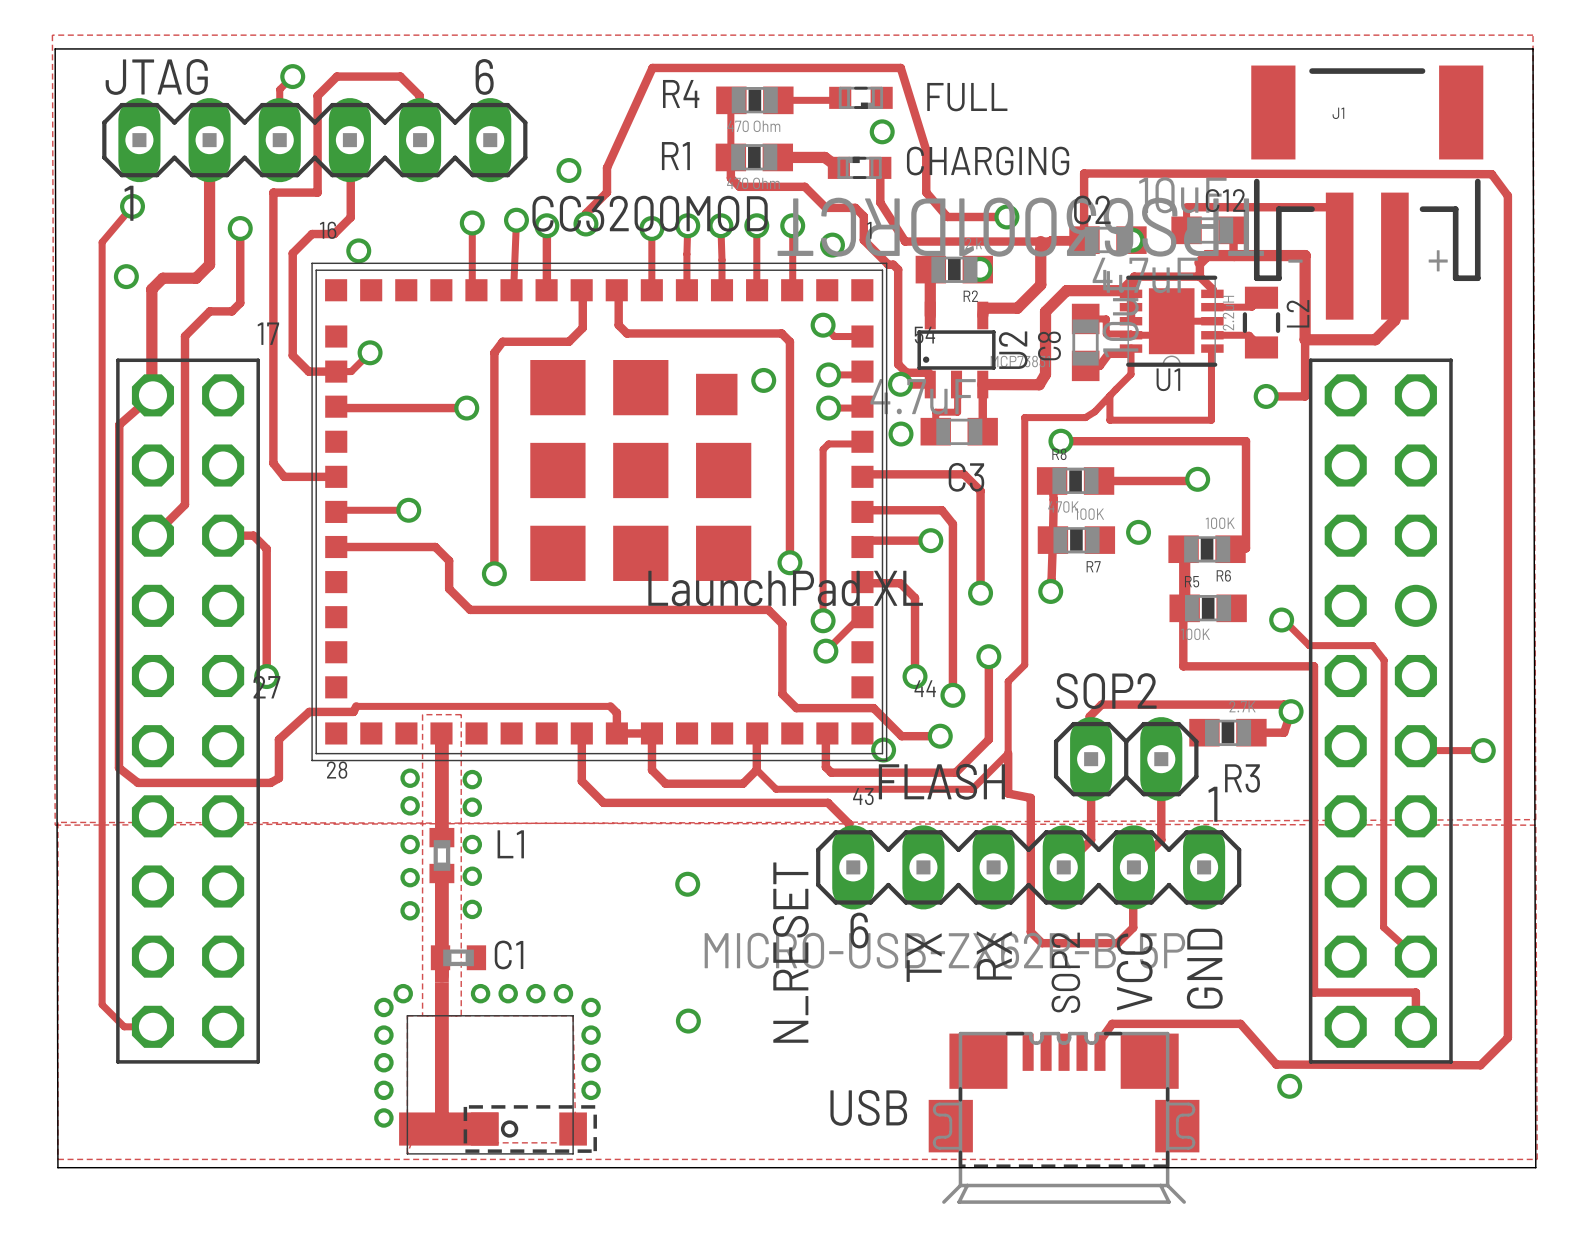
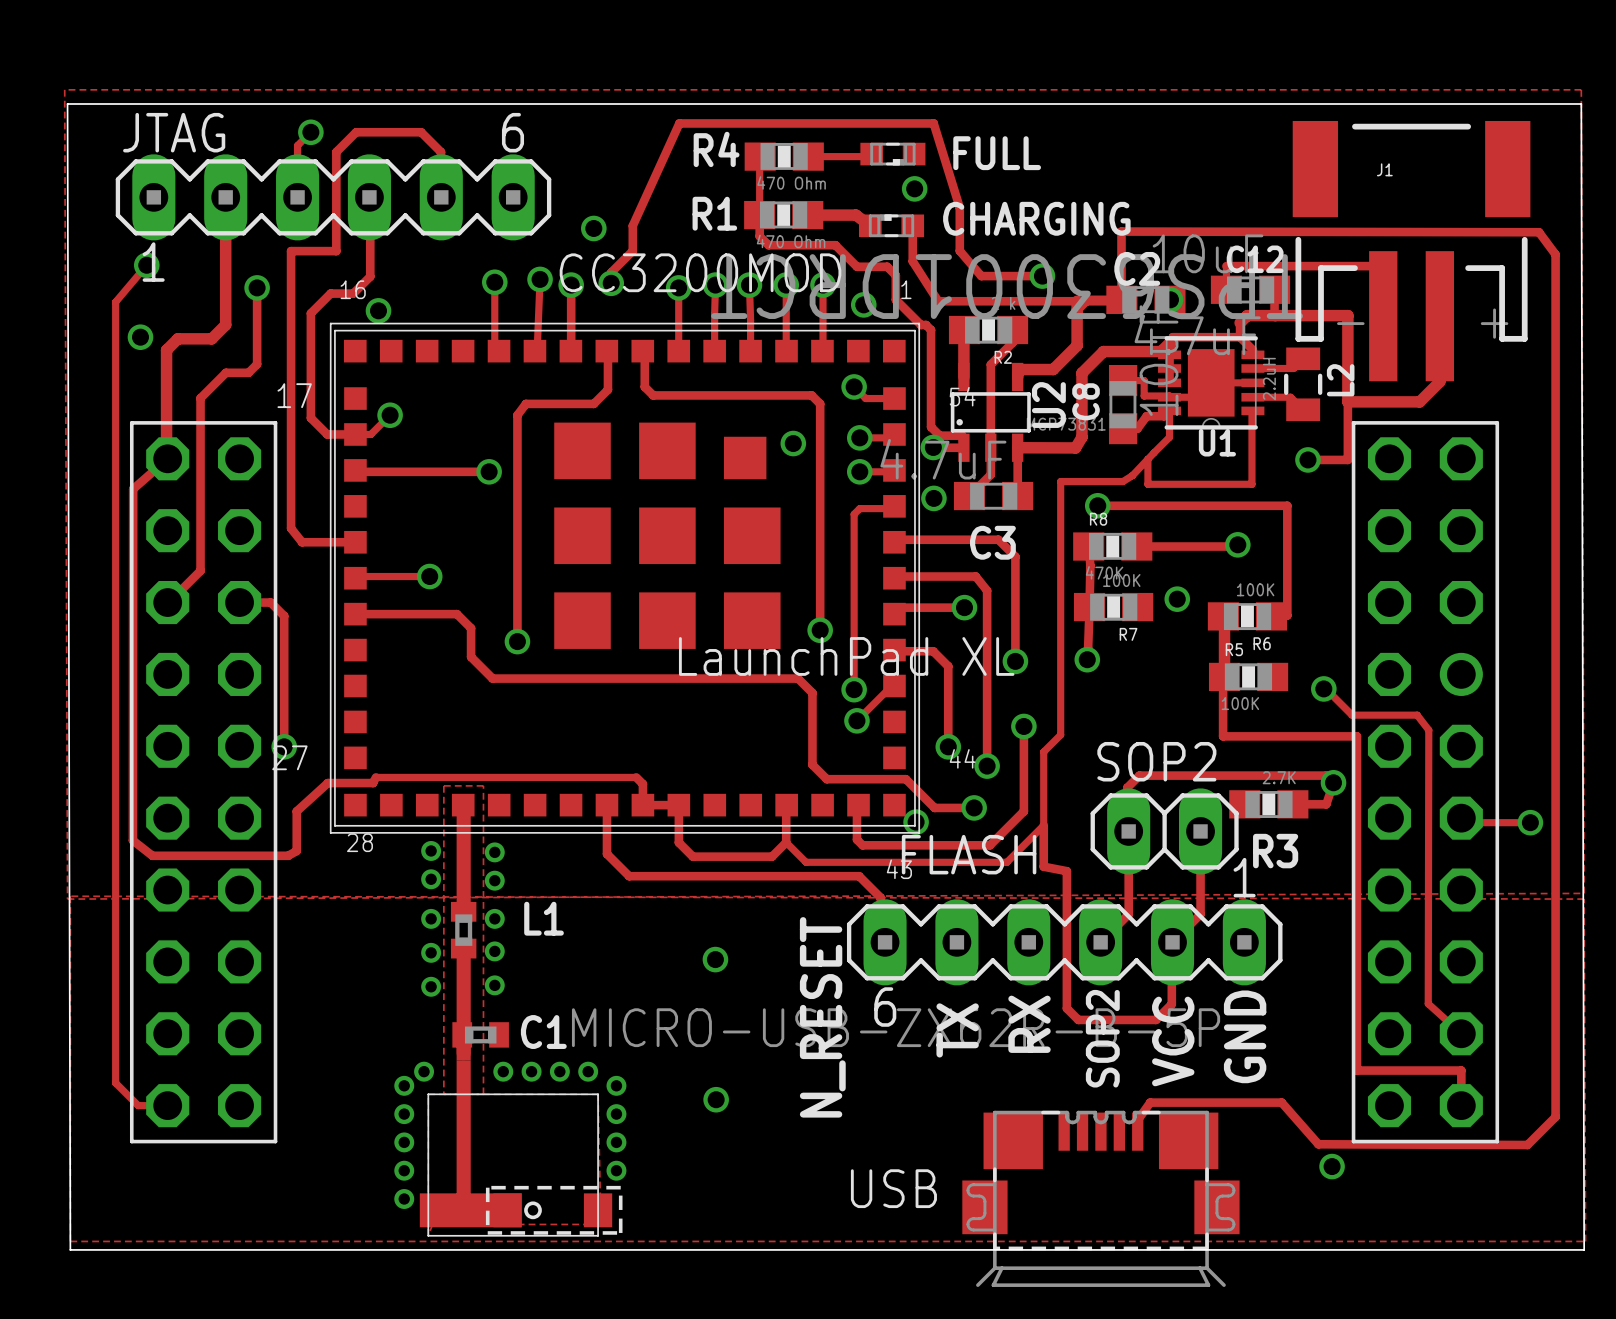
via: (980, 269) -> none
track: (956, 384) (957, 412) (935, 412) (935, 431) -> (1012, 330) (1012, 342) (990, 364) (990, 474) (969, 496)

